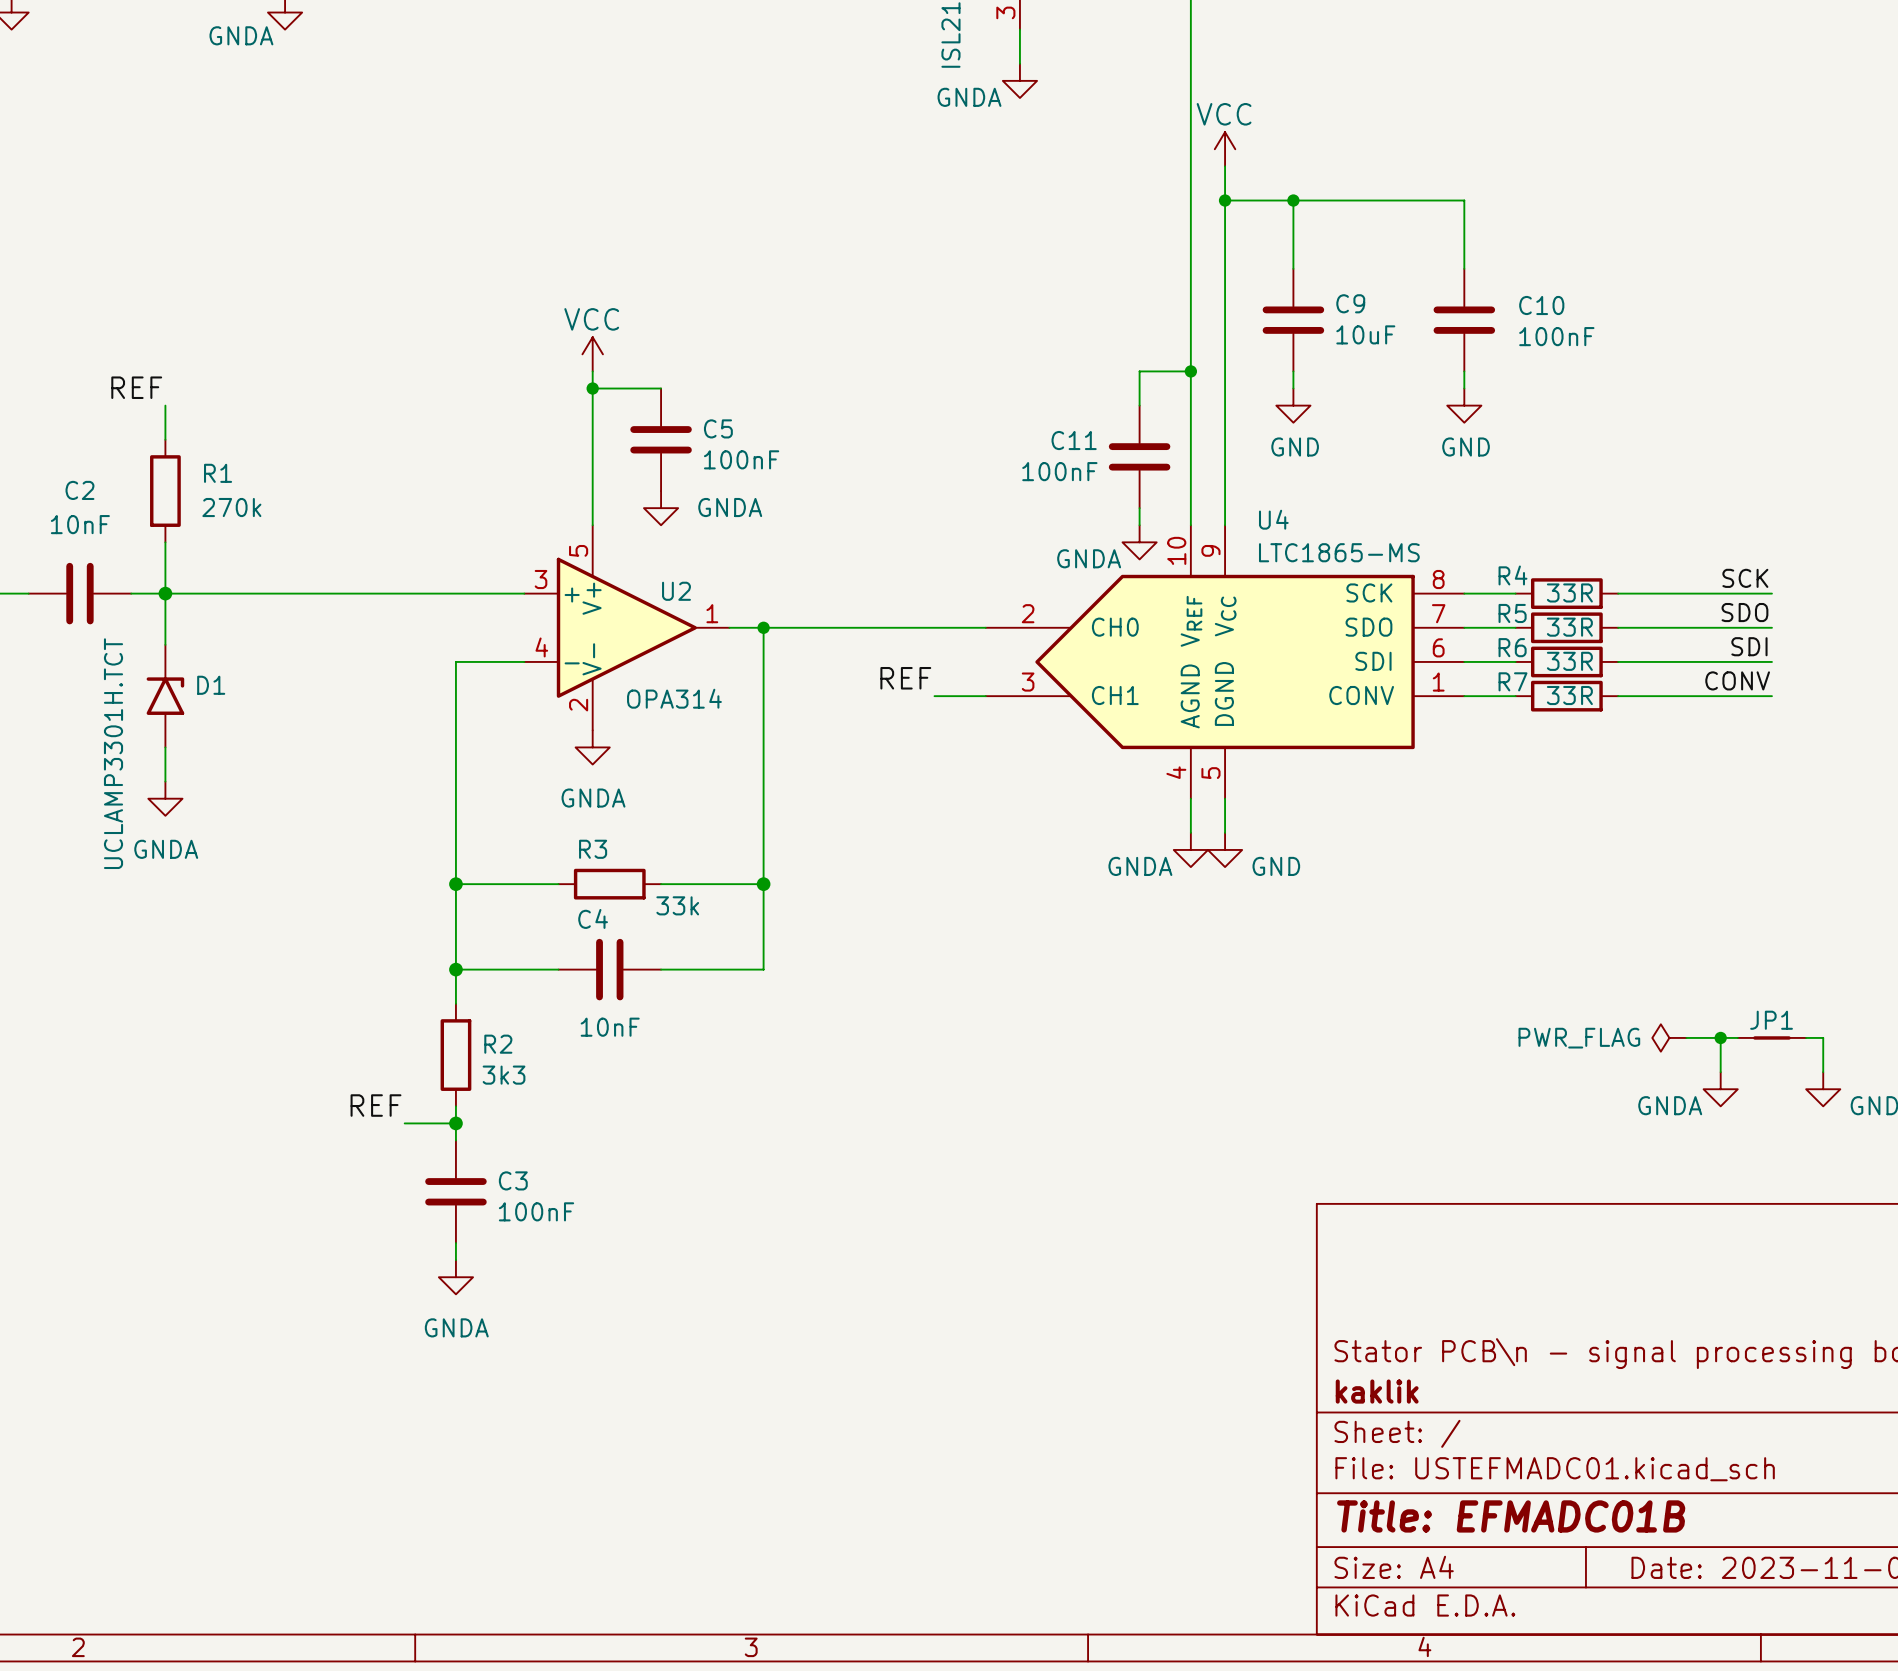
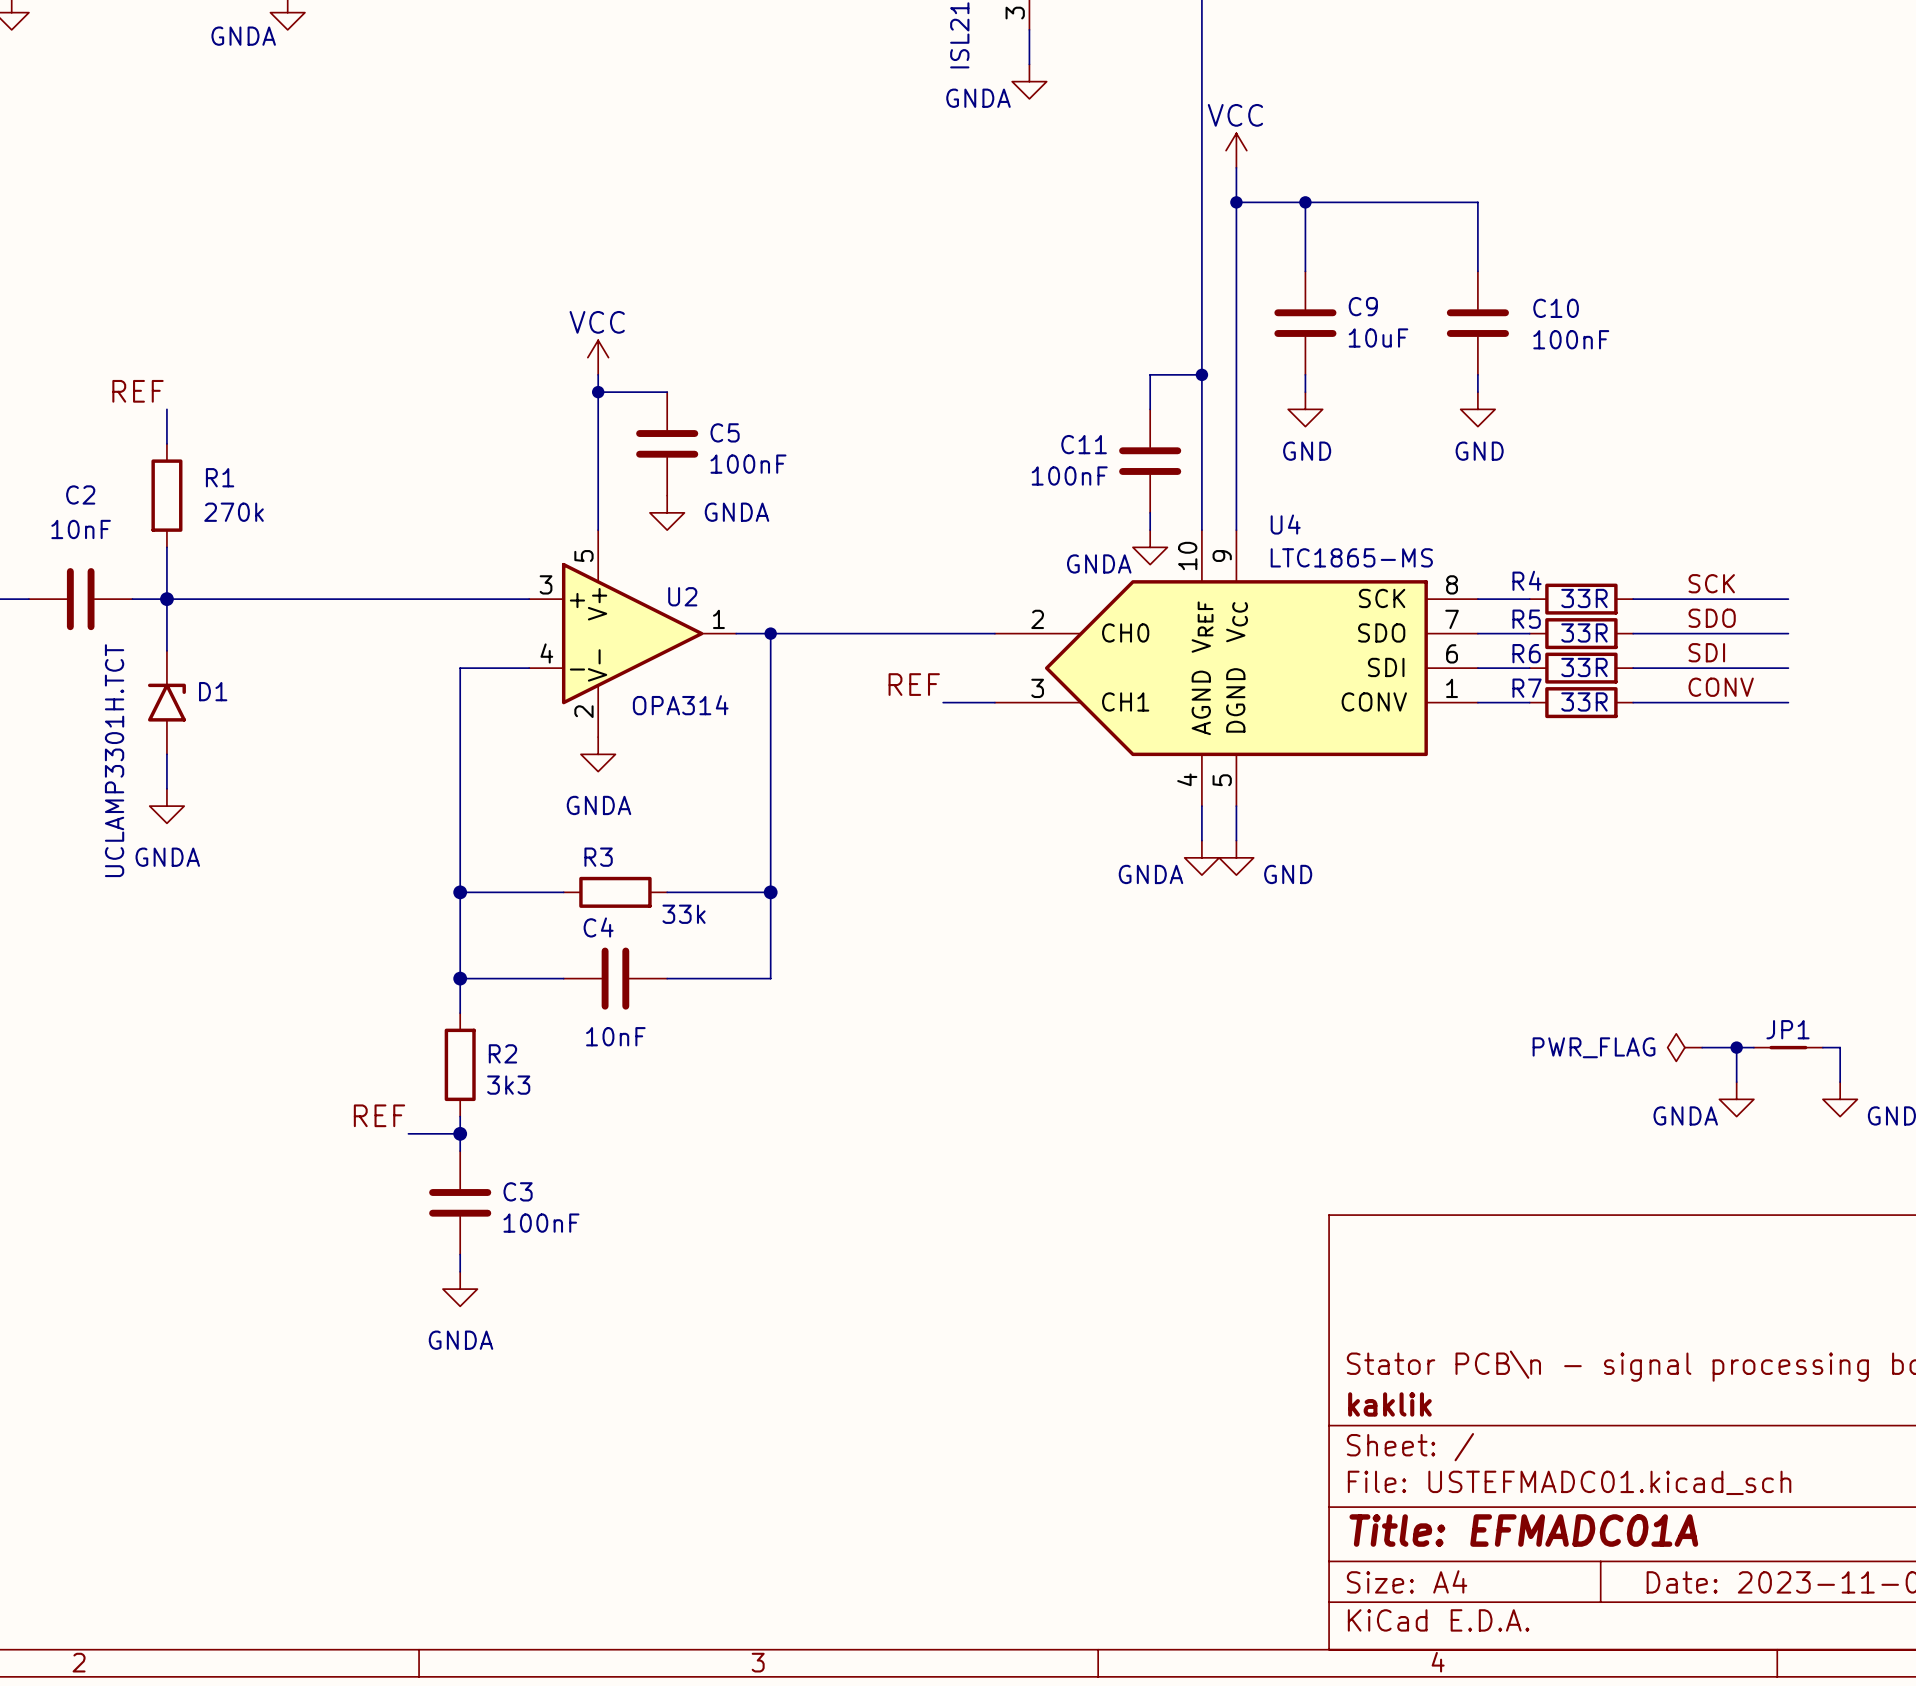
label position: SCK (1745, 578) -> SCK (1711, 583)
label position: SDO (1744, 612) -> SDO (1712, 618)
label position: SDI (1749, 646) -> SDI (1706, 652)
label position: CONV (1737, 680) -> CONV (1721, 687)
title block: Title: EFMADC01B (1511, 1516) -> Title: EFMADC01A (1523, 1530)

